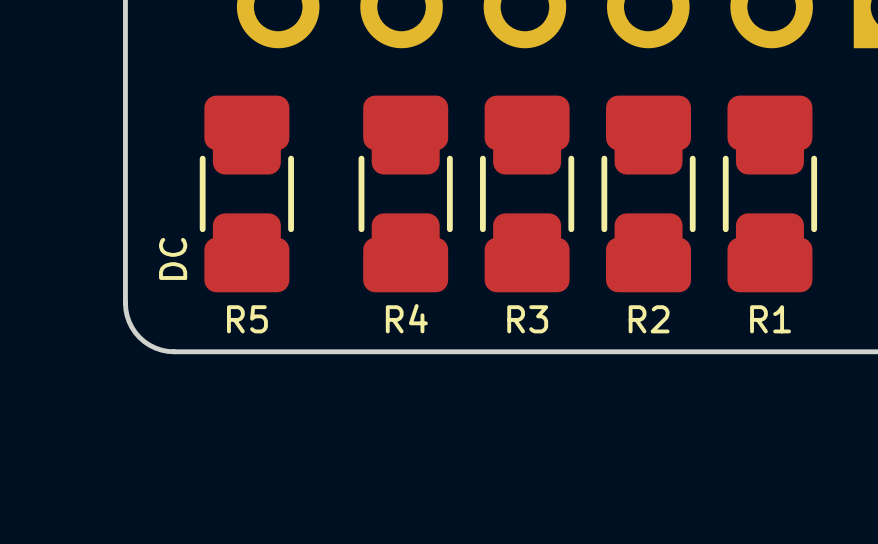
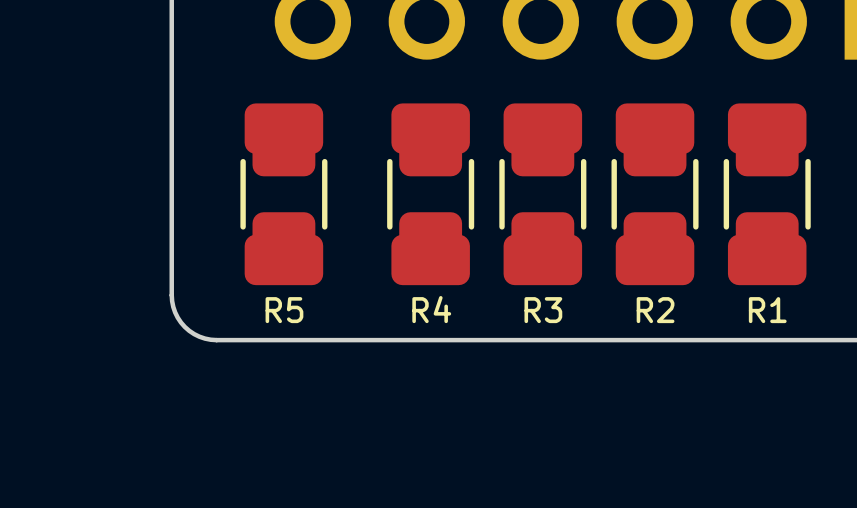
text: DC (173, 258) -> none

